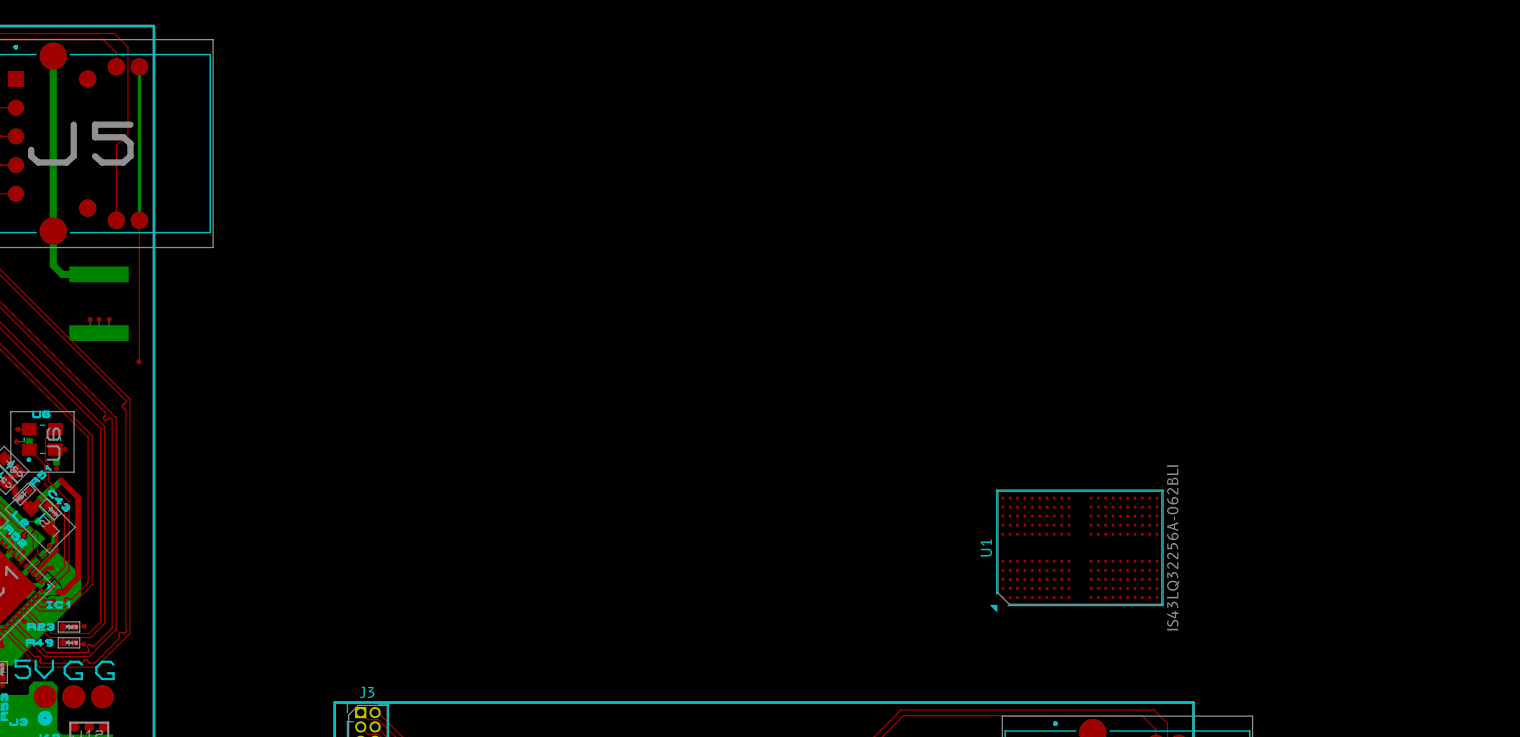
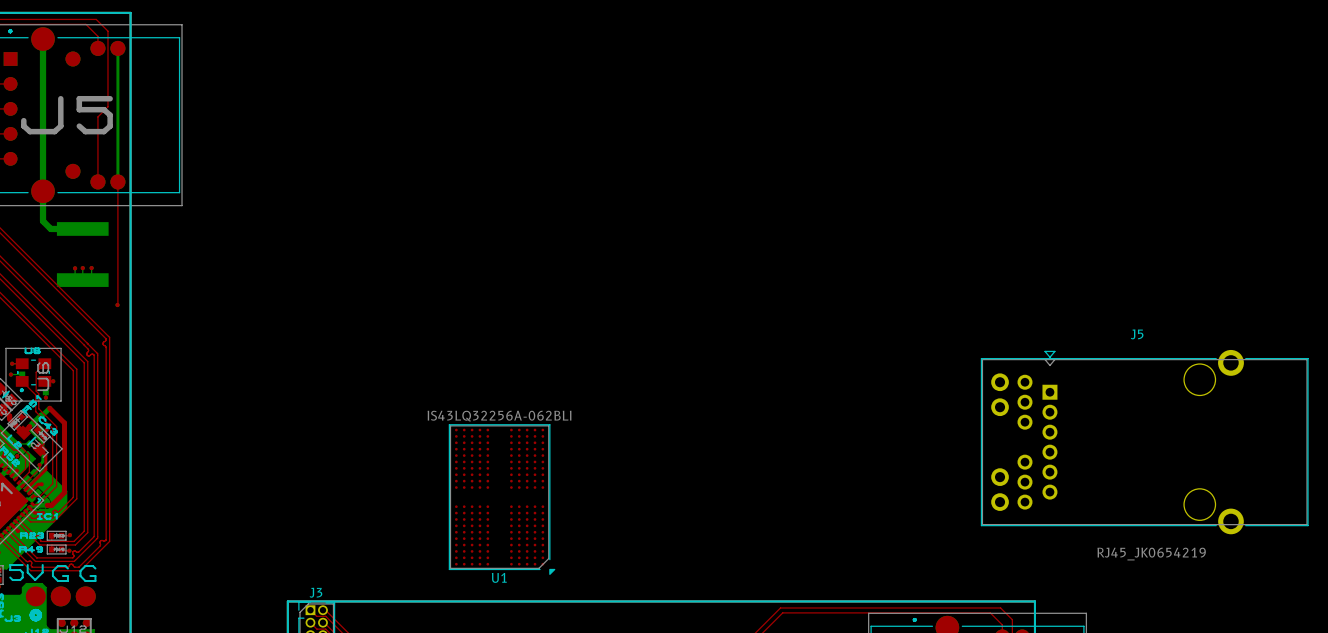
J5: none -> RJ45_JK0654219 (1144, 442)
U1 rotation: 0° (1077, 550) -> 90° counterclockwise (502, 499)
U1 position: (1077, 550) -> (502, 499)

